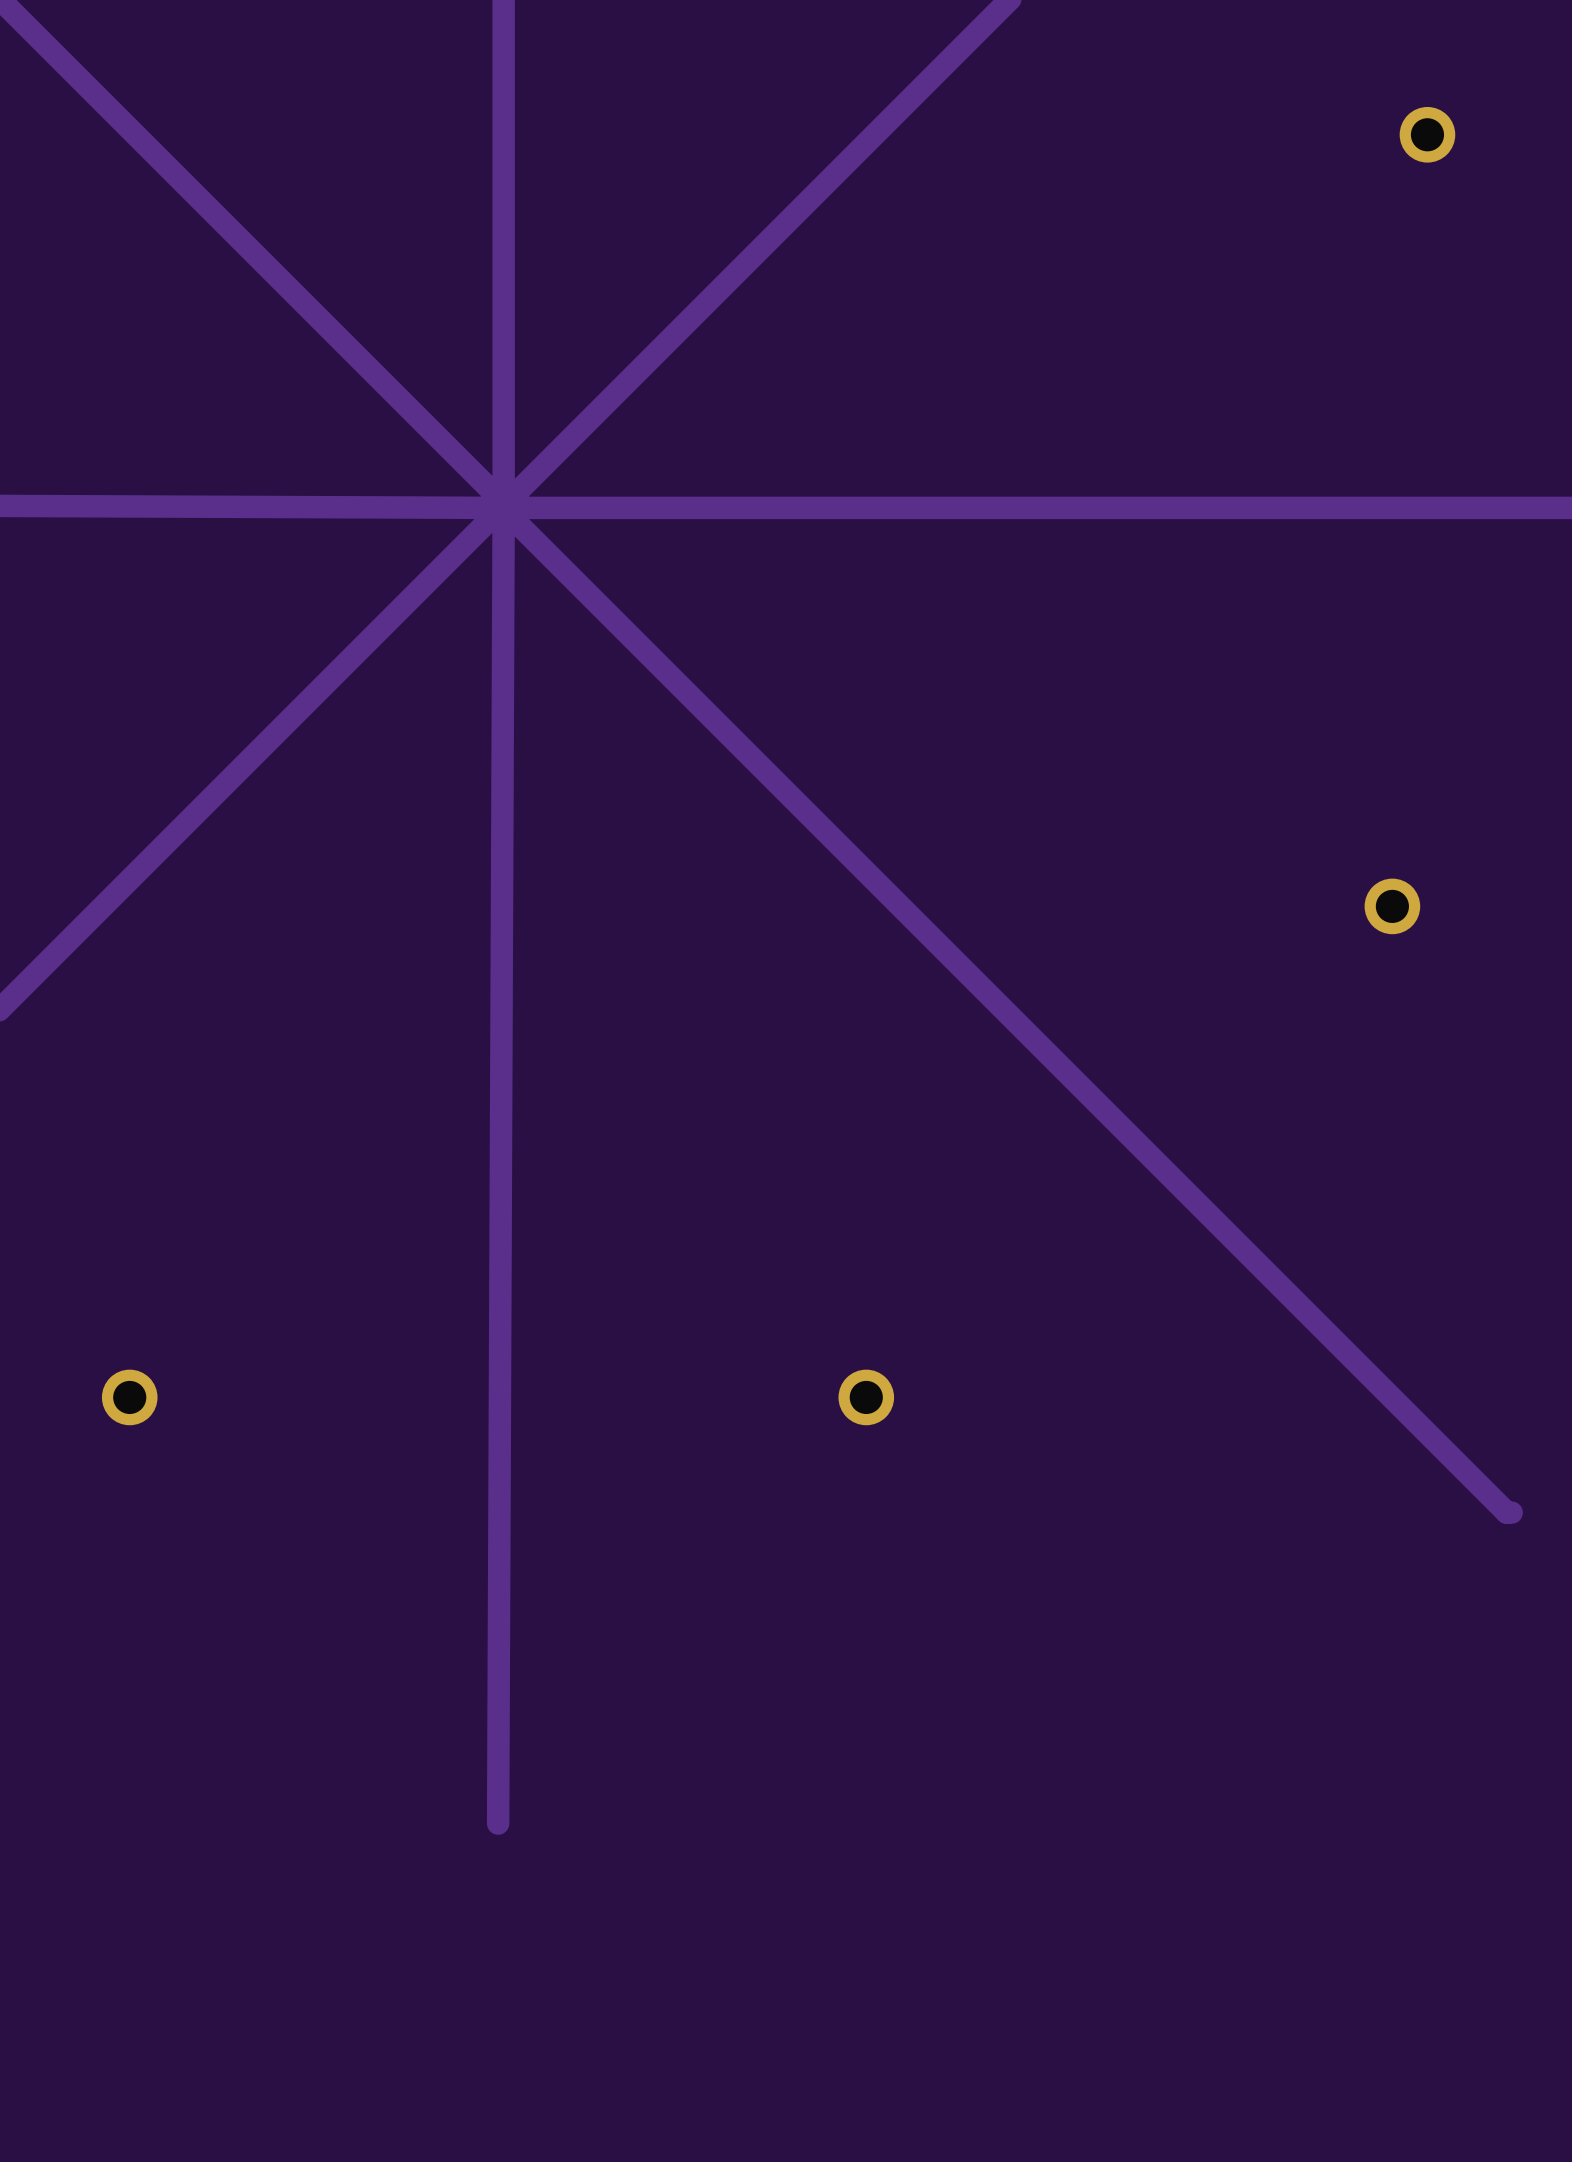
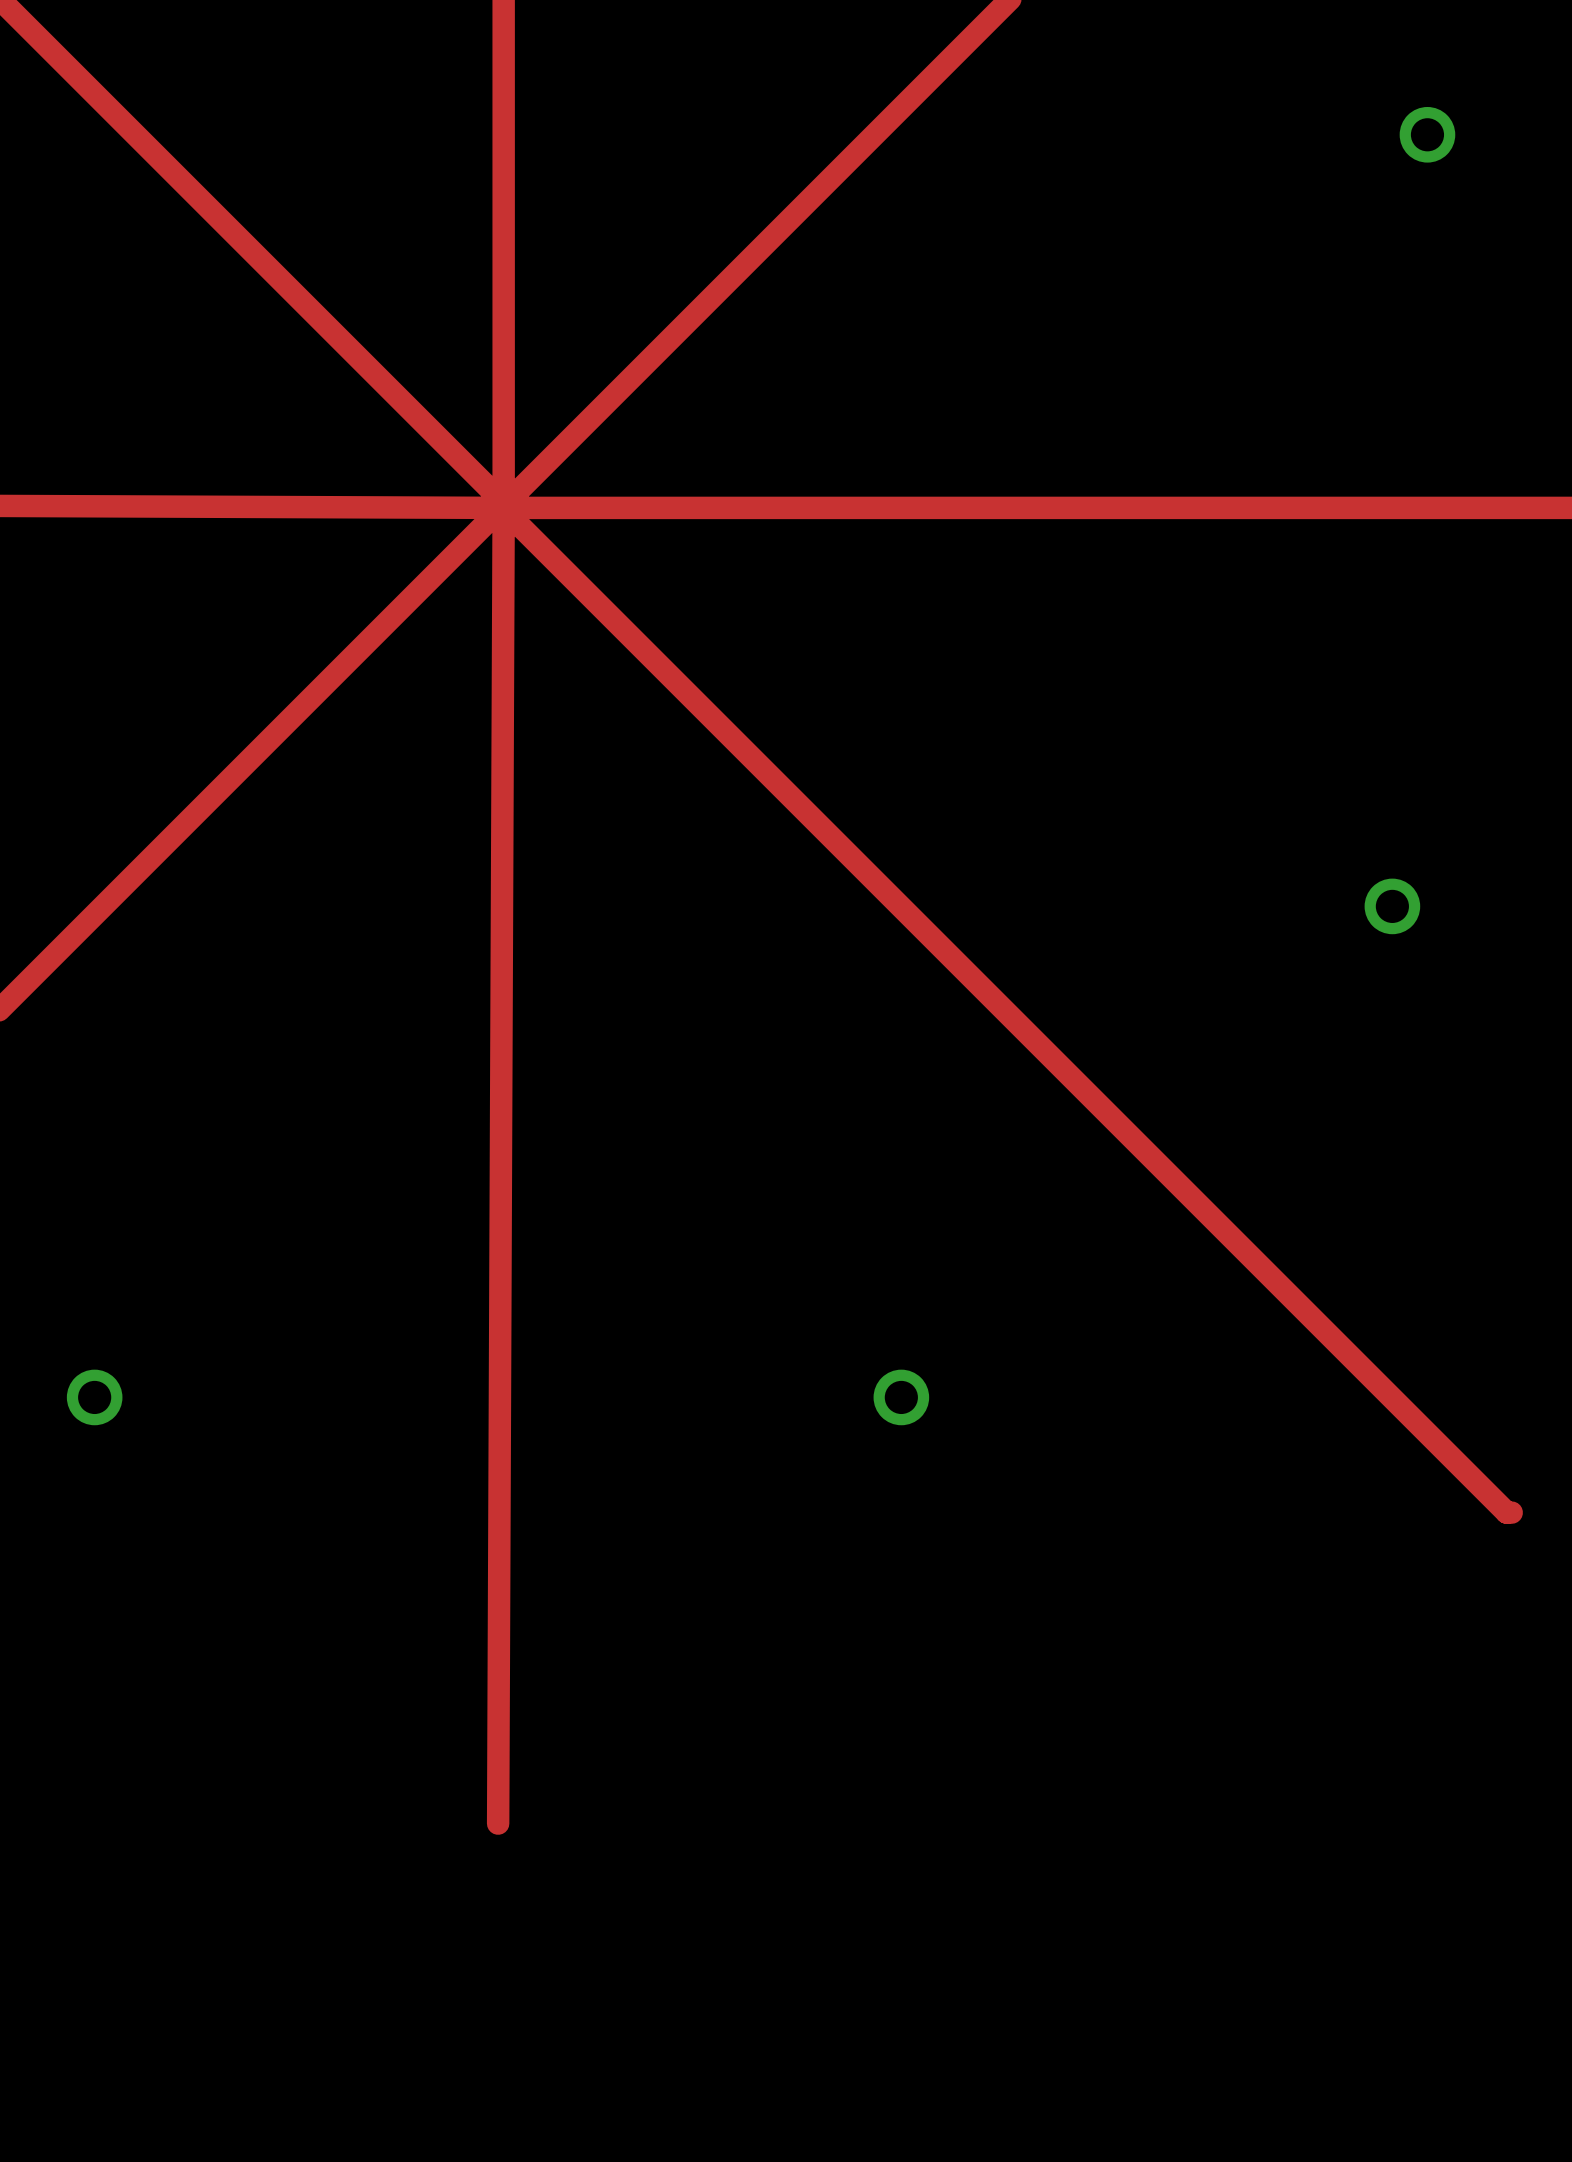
via position: (129, 1397) -> (94, 1397)
via position: (866, 1397) -> (901, 1397)

